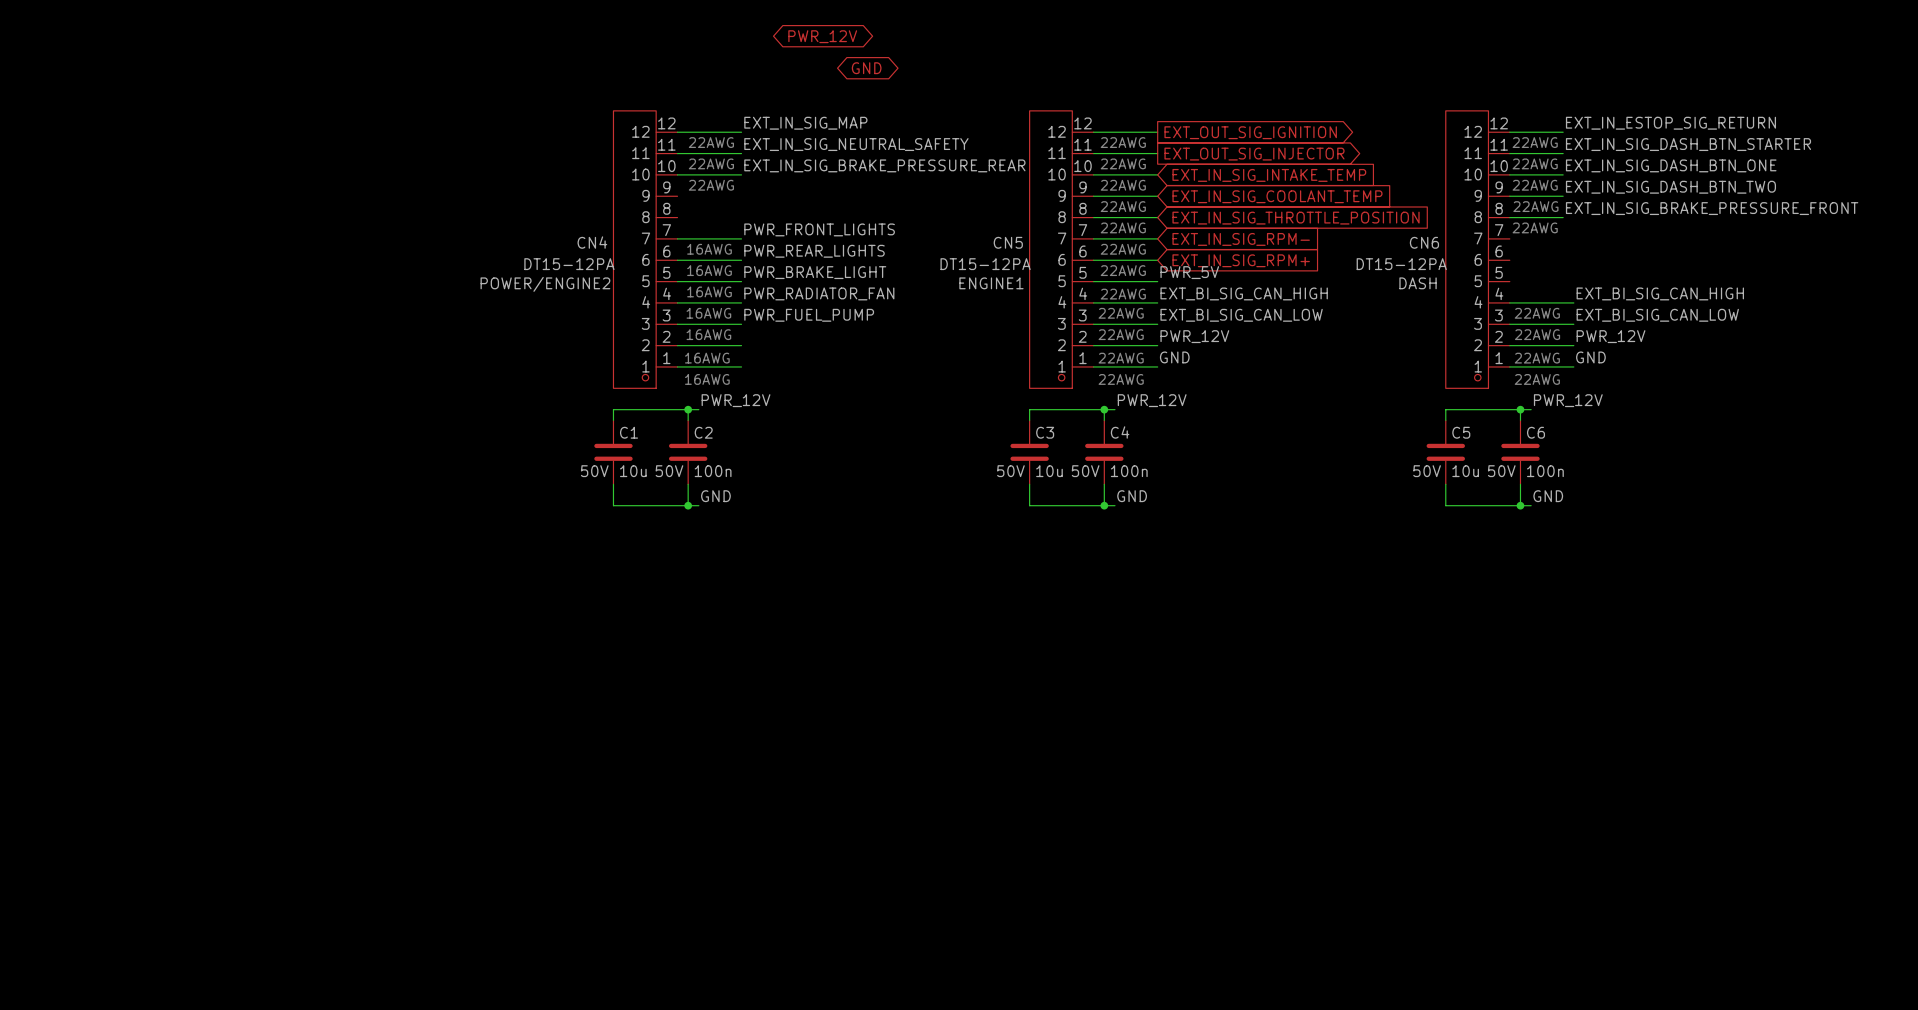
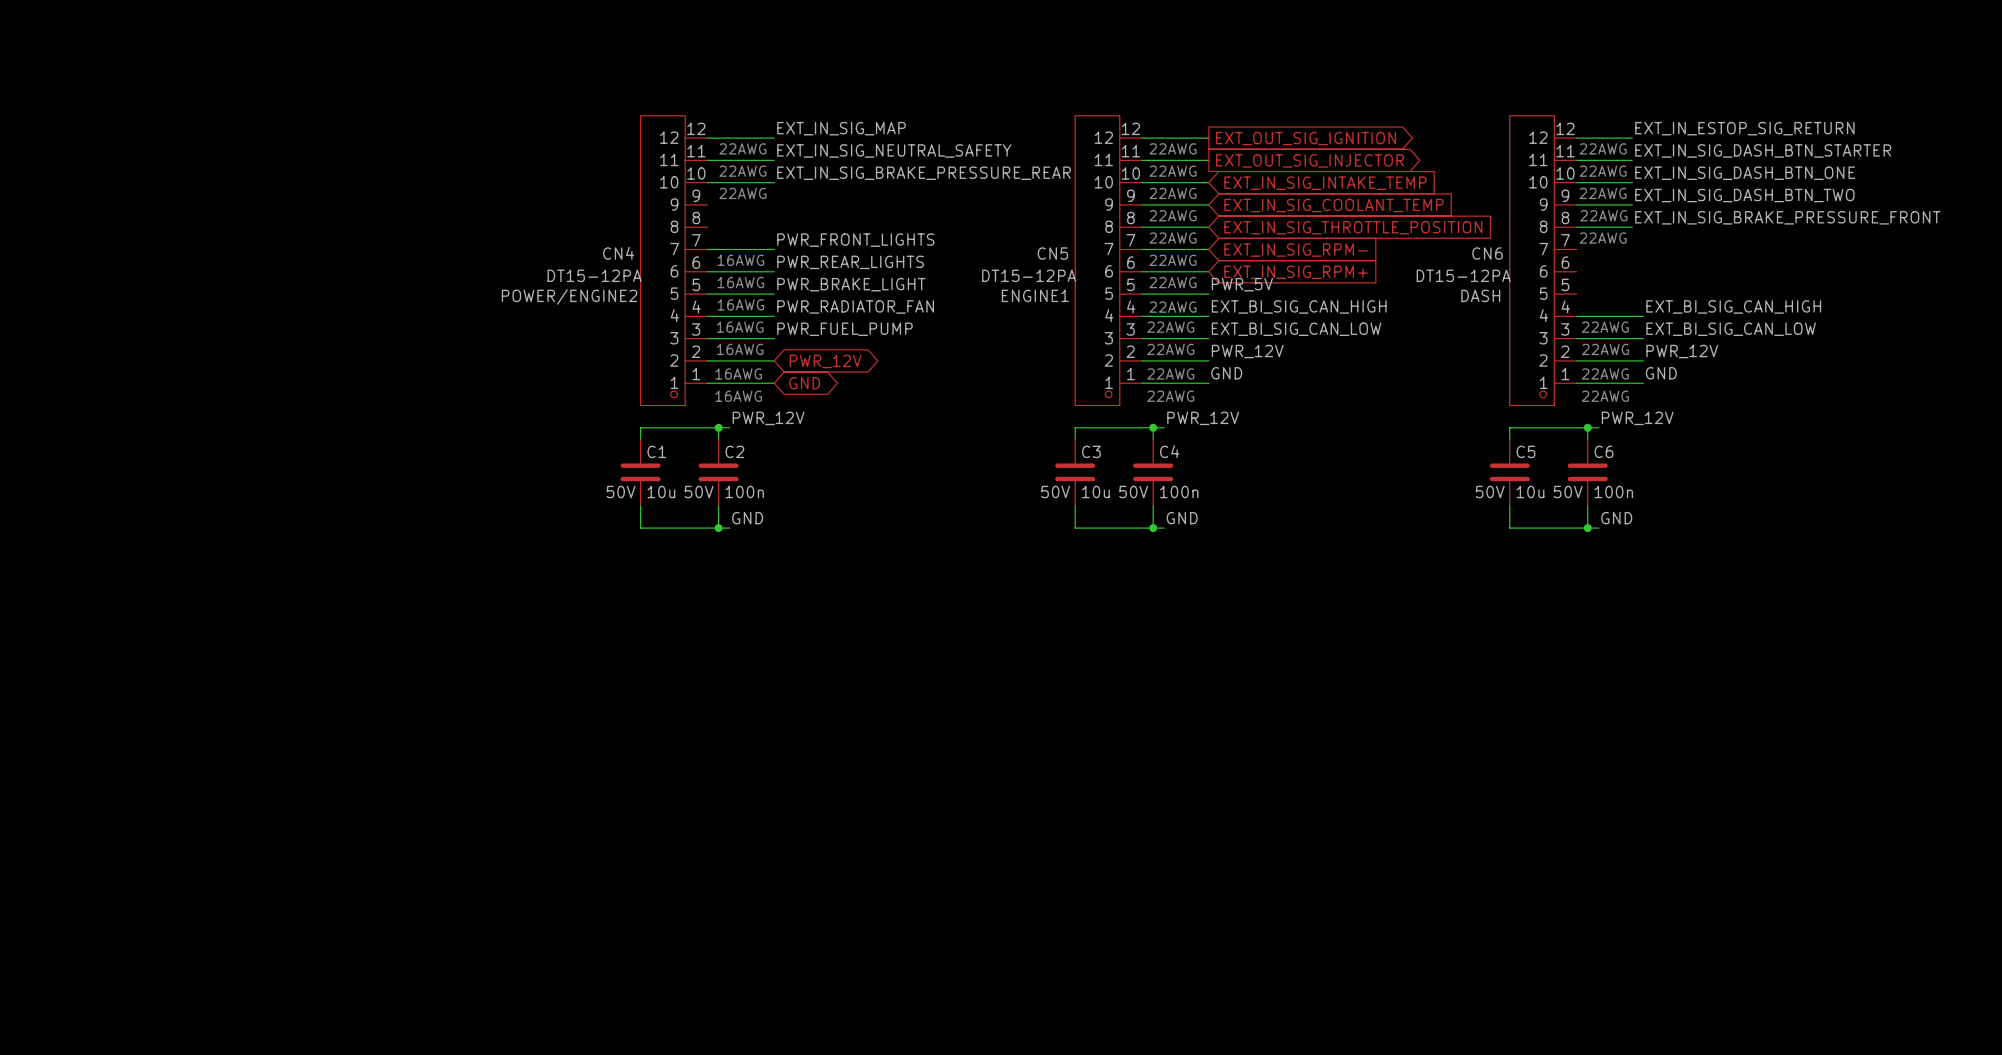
global label: PWR_12V (822, 36) -> none
global label: GND (866, 68) -> none
global label: none -> PWR_12V (825, 361)
global label: none -> GND (804, 383)

